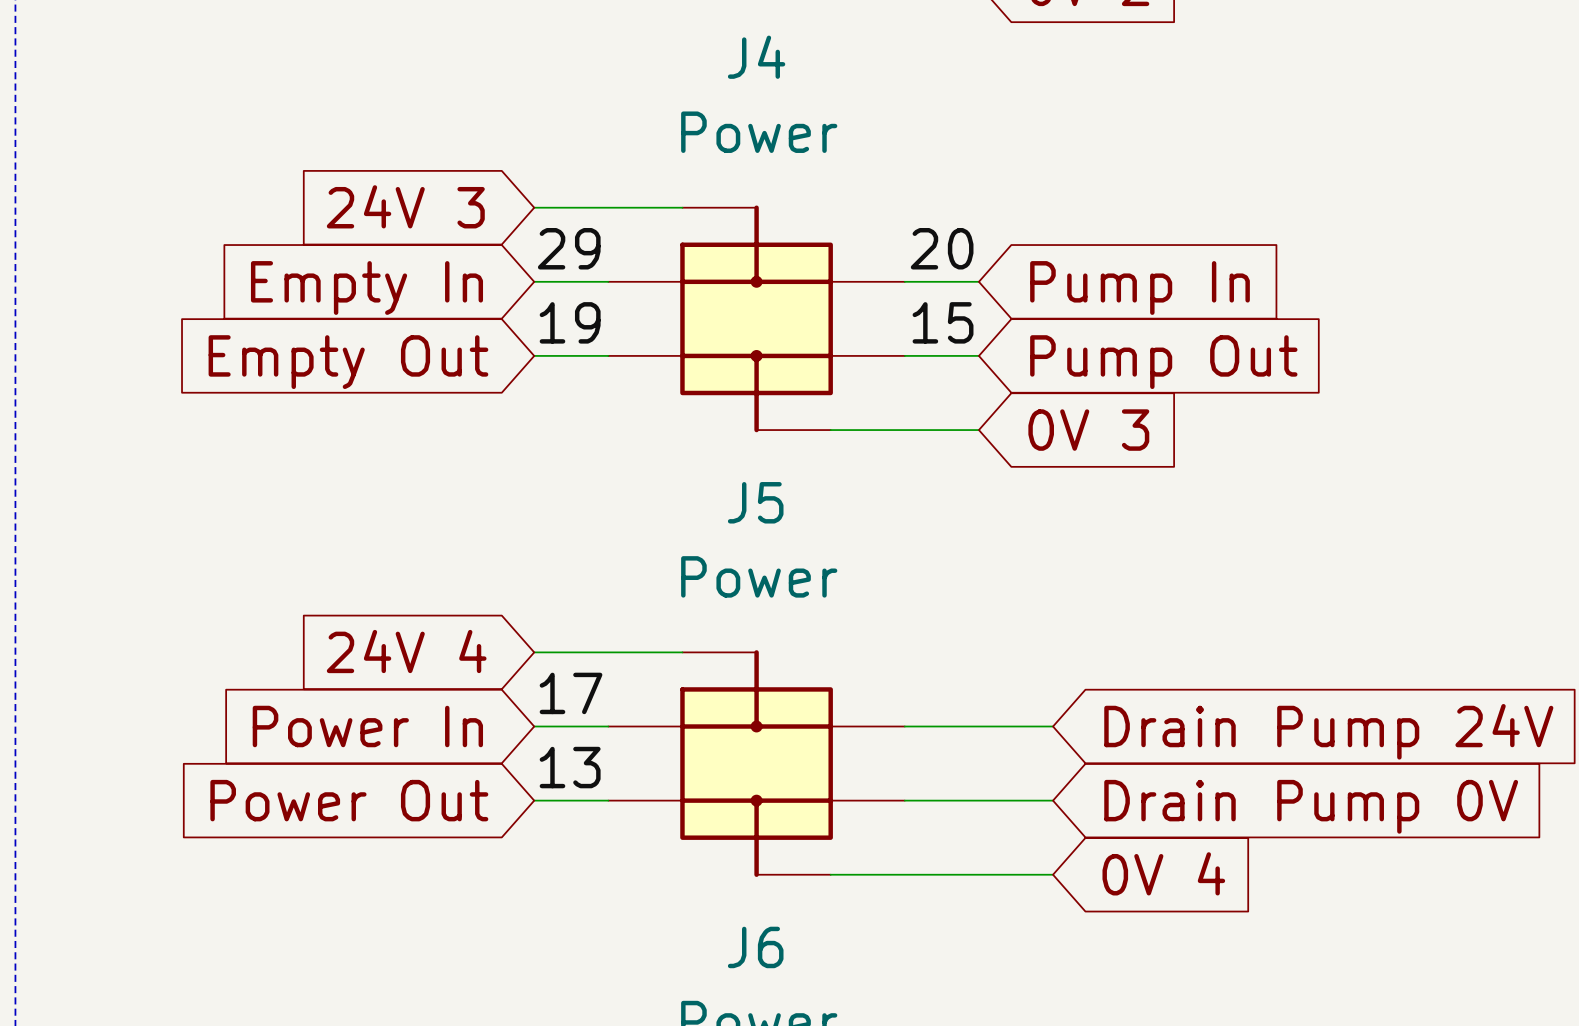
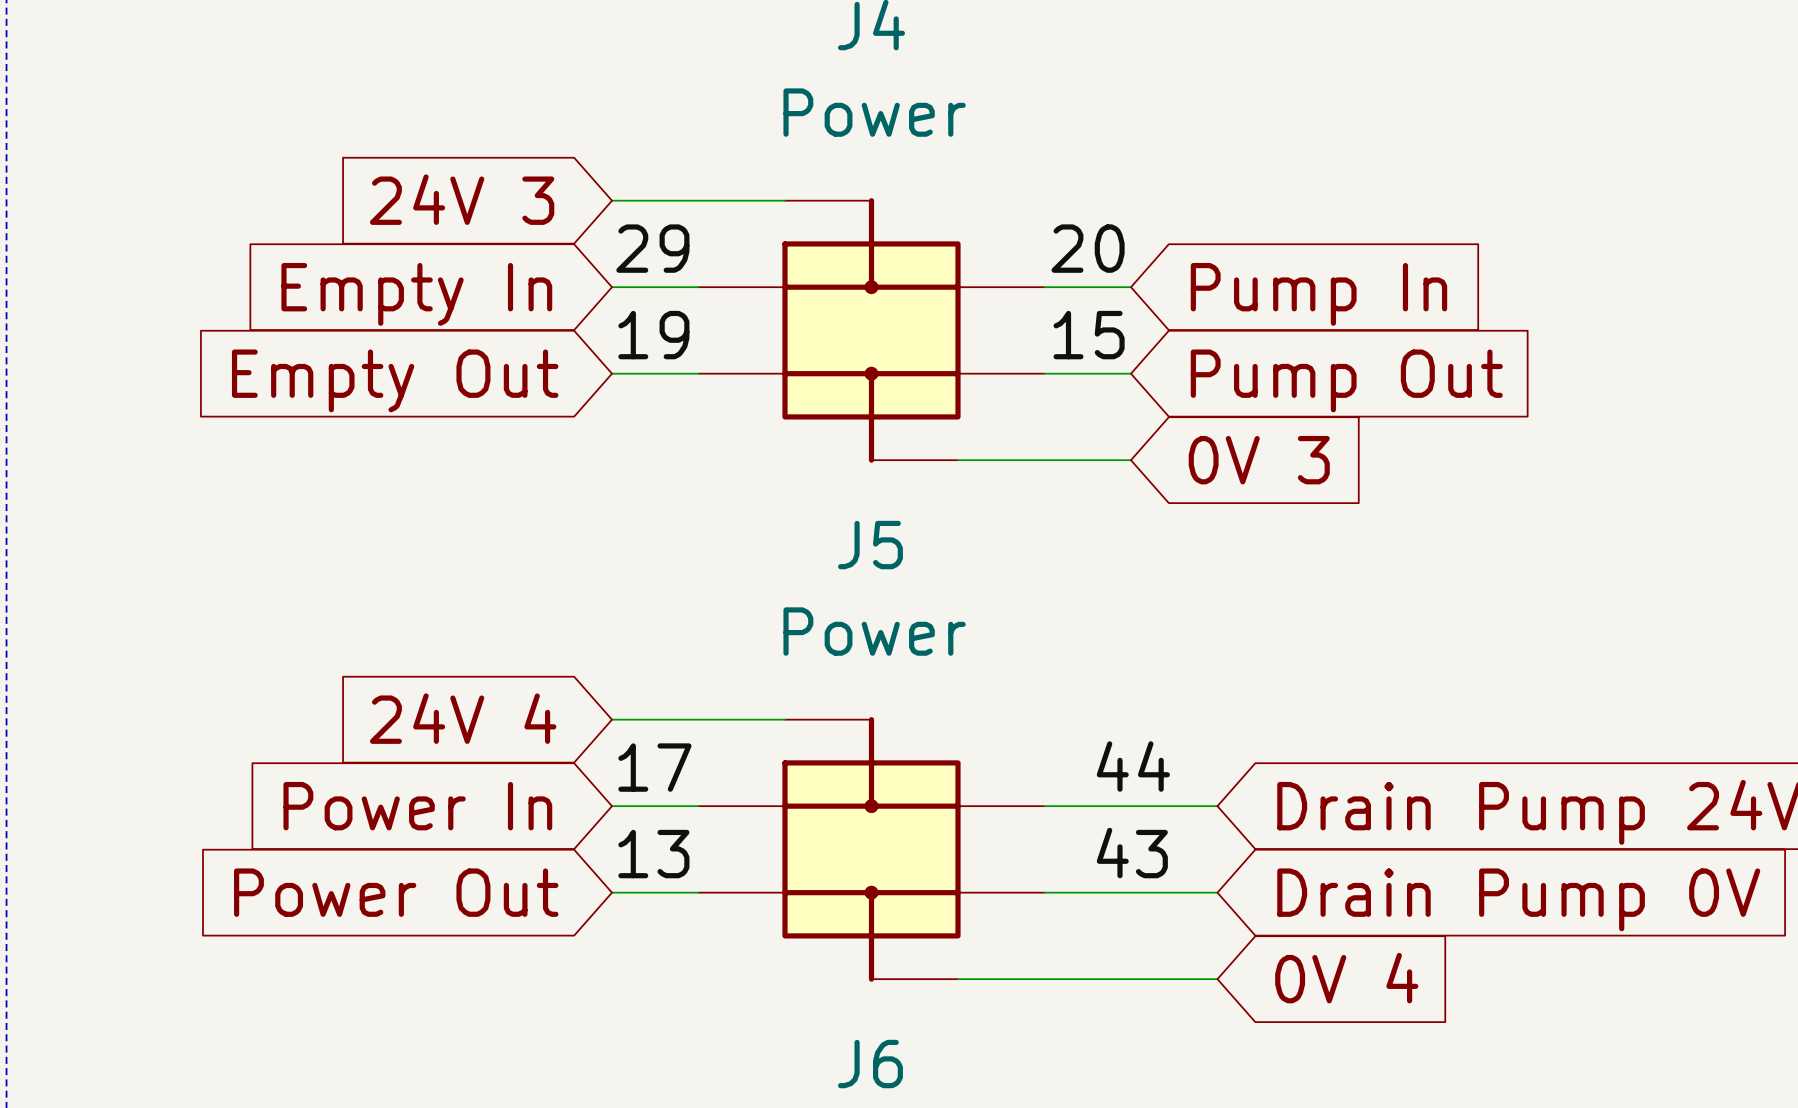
label: none -> 44 (1133, 766)
label: none -> 43 (1132, 853)

